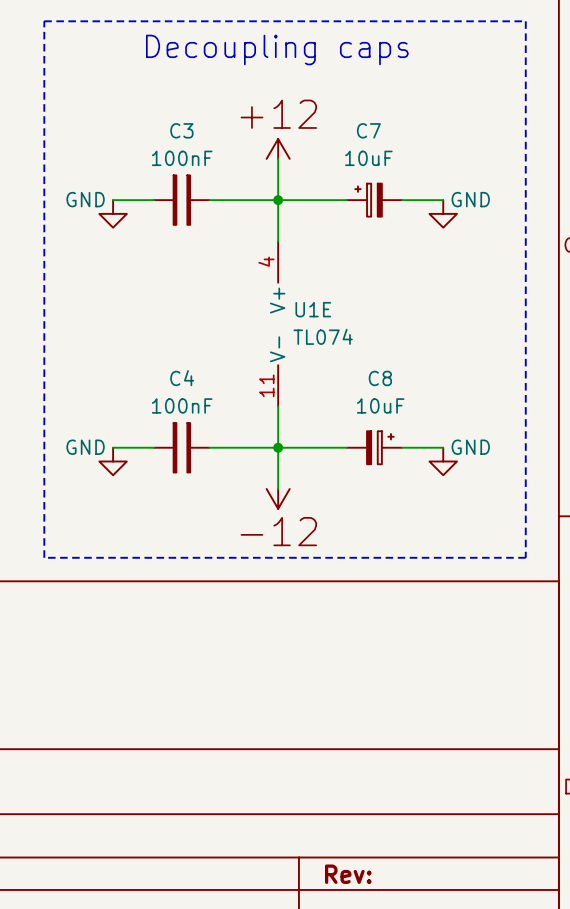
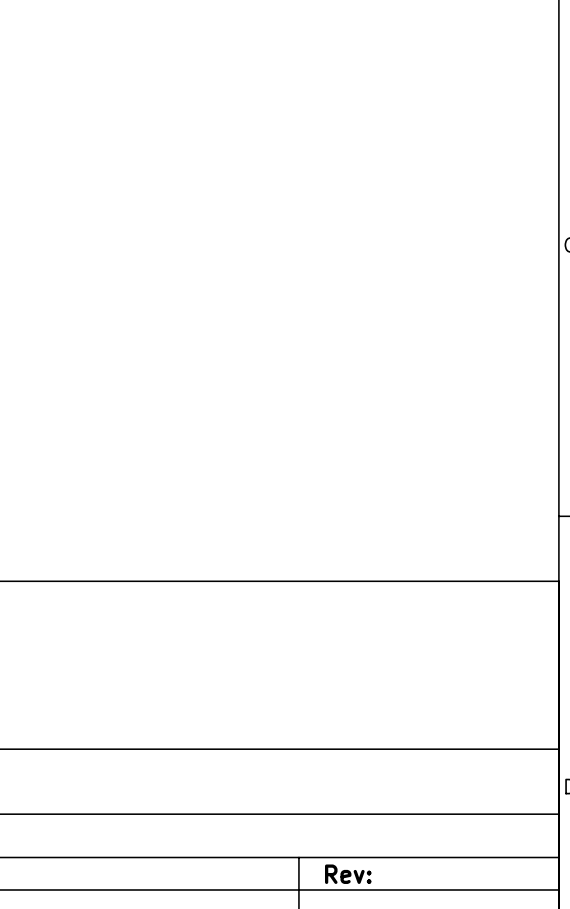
line: (44, 21) (525, 21) (525, 557) (44, 557) (44, 21) -> none
text: Decoupling caps (277, 49) -> none
power symbol: (278, 148) -> none
wire: (278, 158) (278, 241) -> none
wire: (113, 200) (154, 200) -> none
C3: 100nF (181, 200) -> none
wire: (209, 200) (346, 200) -> none
junction: (278, 200) -> none
C7: 10uF (374, 200) -> none
wire: (401, 200) (443, 200) -> none
power symbol: GND (113, 213) -> none
power symbol: GND (443, 213) -> none
U1E: TL074 (278, 323) -> none
wire: (278, 406) (278, 489) -> none
wire: (113, 447) (154, 447) -> none
C4: 100nF (181, 447) -> none
wire: (209, 447) (346, 447) -> none
junction: (278, 447) -> none
C8: 10uF (374, 447) -> none
wire: (401, 447) (443, 447) -> none
power symbol: GND (113, 461) -> none
power symbol: GND (443, 461) -> none
power symbol: (278, 498) -> none

